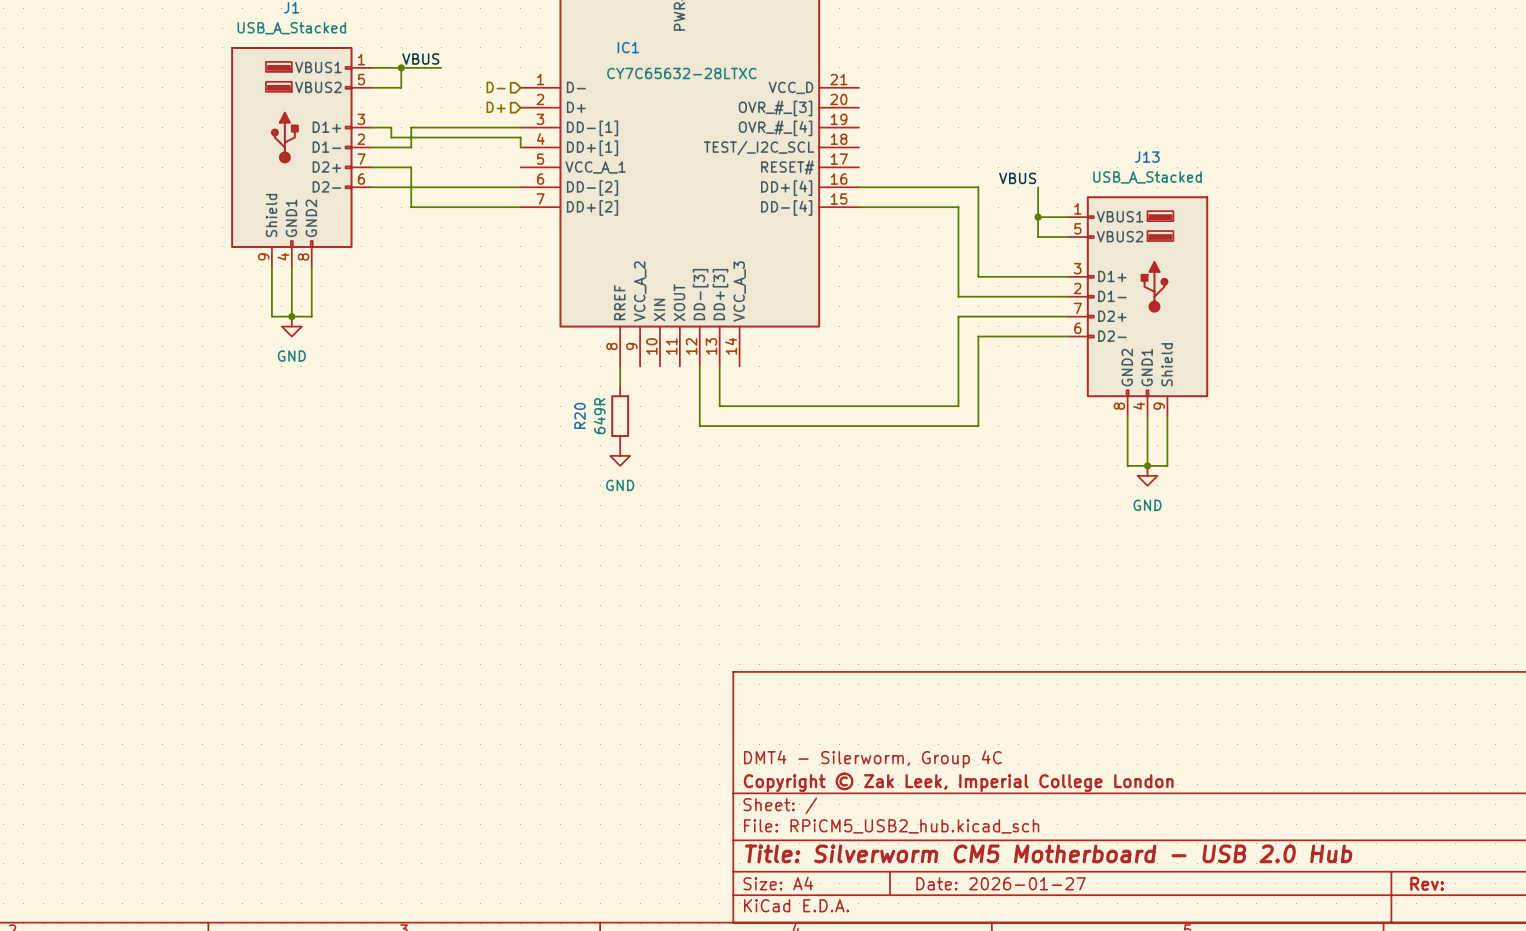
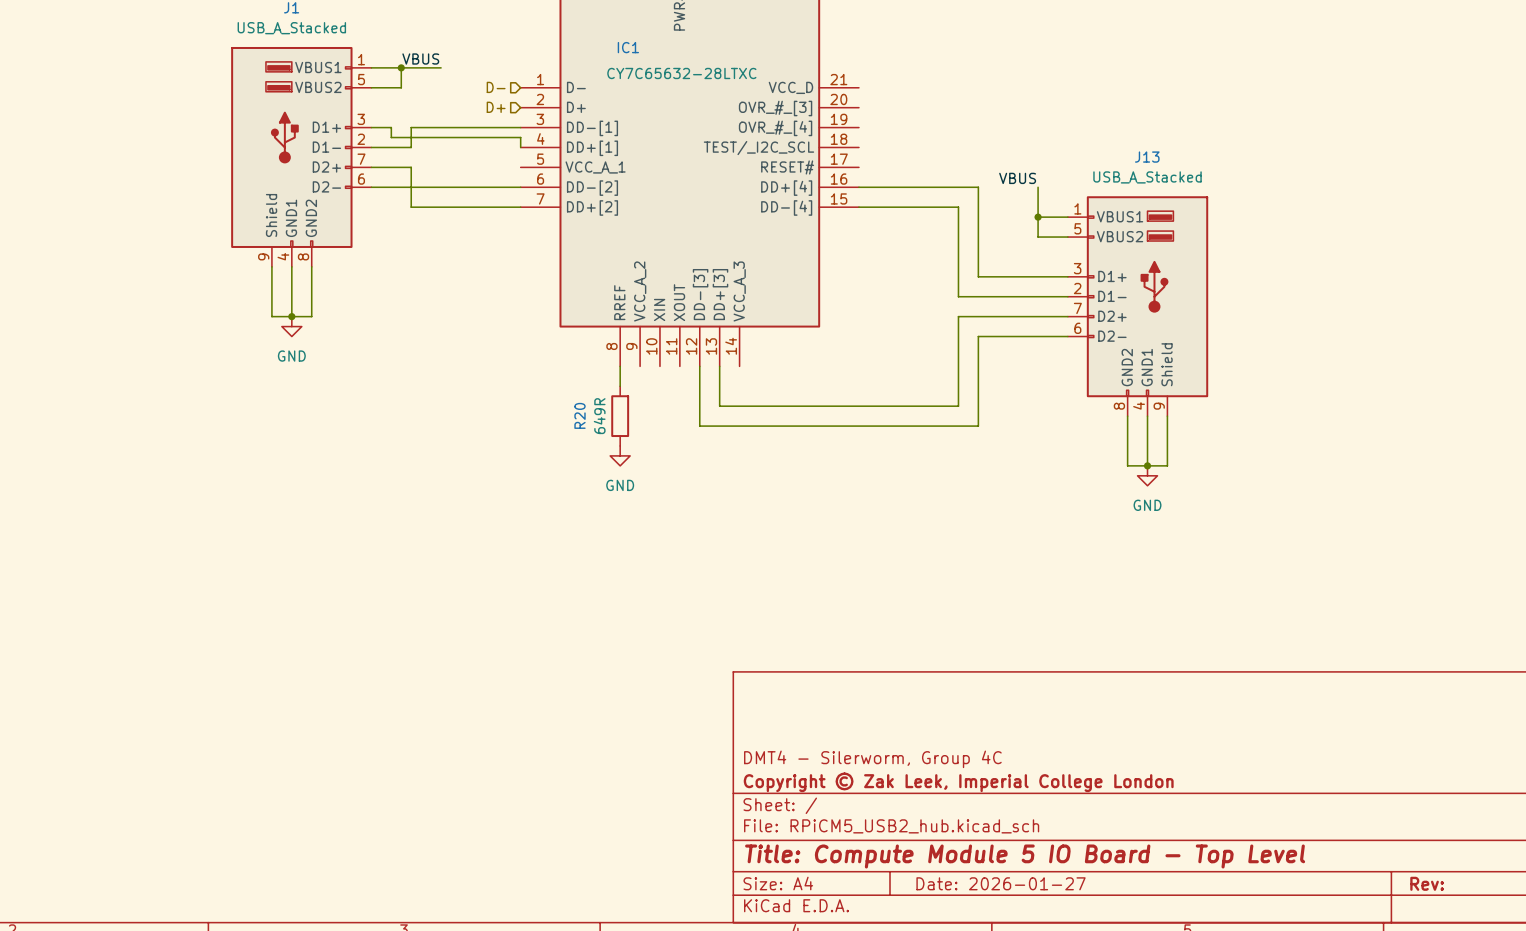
title block: Title: Silverworm CM5 Motherboard - USB 2.0 Hub (1048, 853) -> Title: Compute Module 5 IO Board - Top Level (1025, 856)

